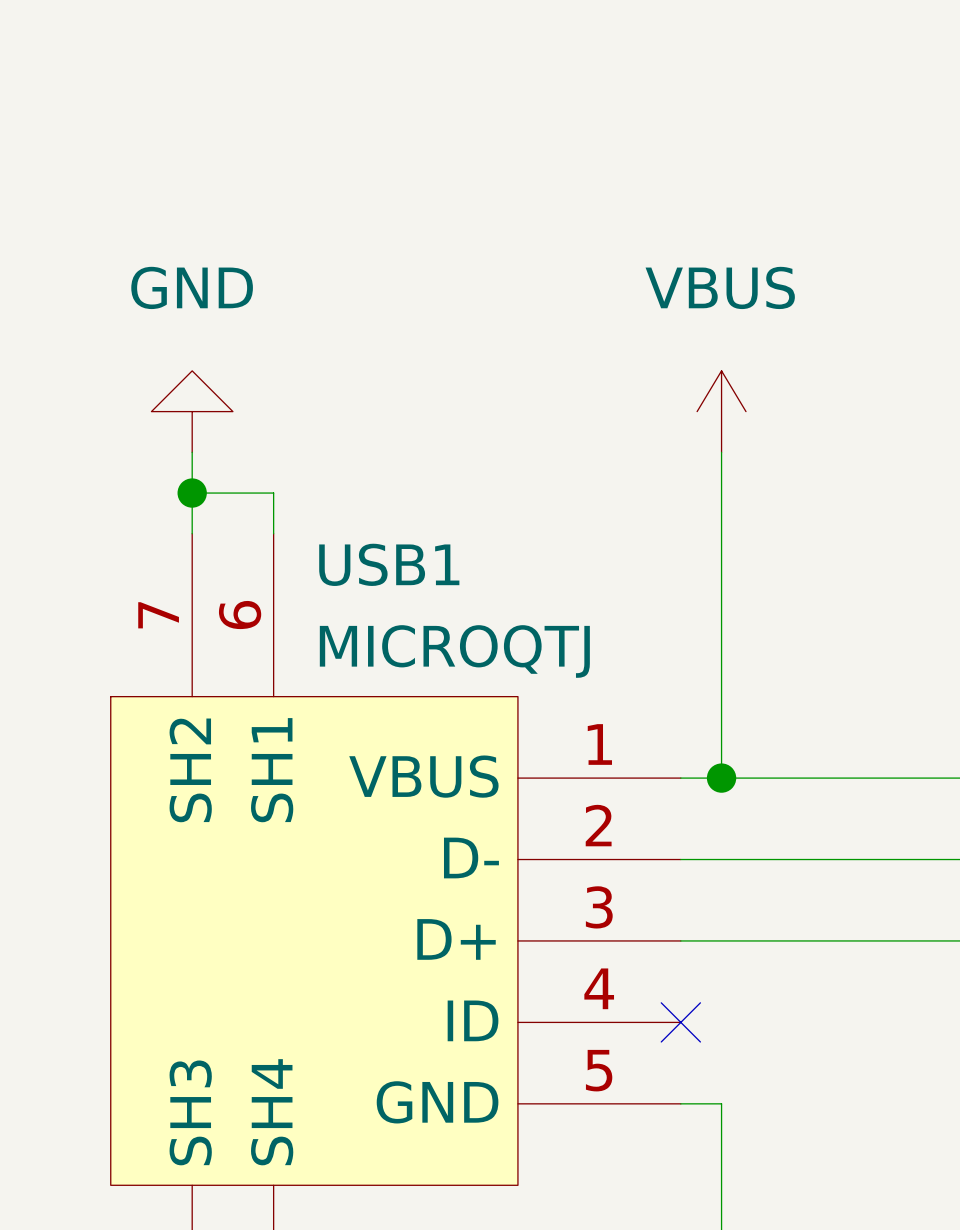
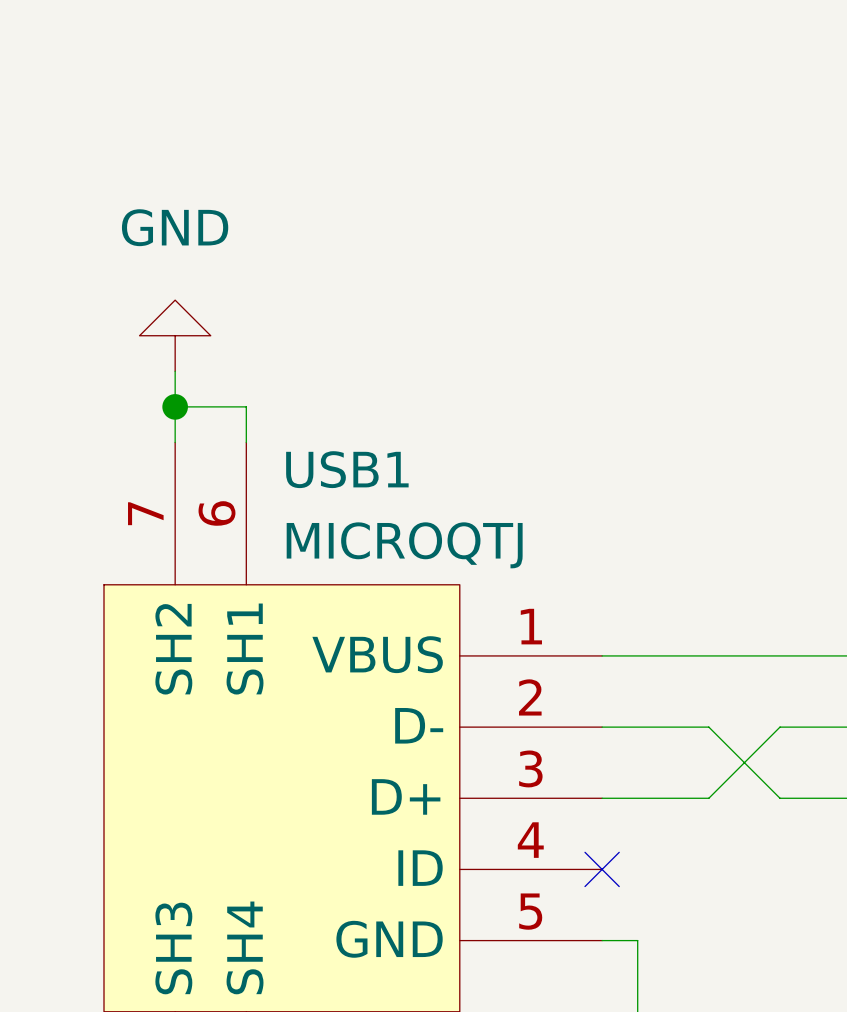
power symbol: VBUS (721, 411) -> none
wire: (721, 452) (721, 778) -> none
junction: (721, 778) -> none
wire: (803, 859) (884, 859) -> (708, 727) (780, 798)
wire: (803, 940) (884, 940) -> (708, 798) (780, 727)

